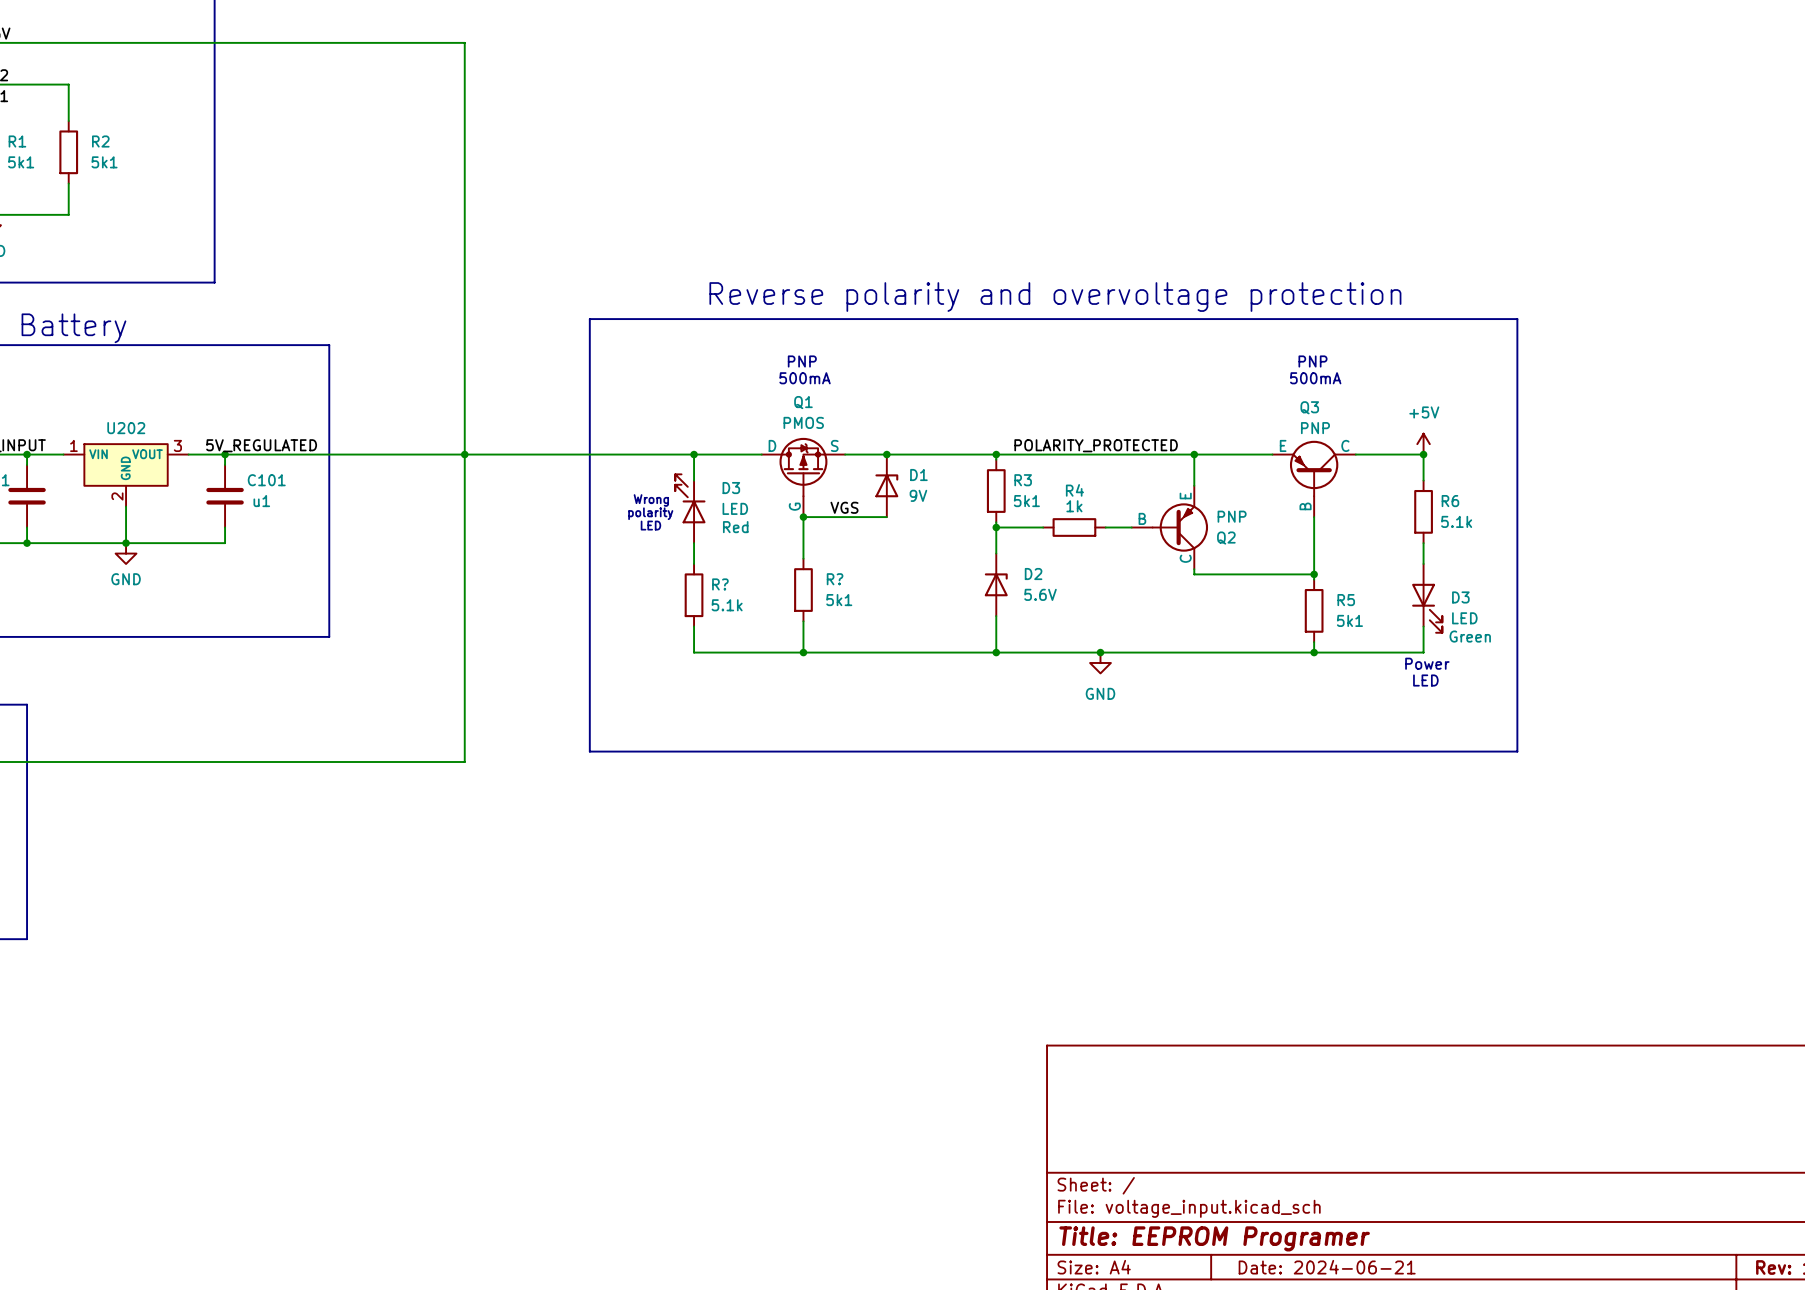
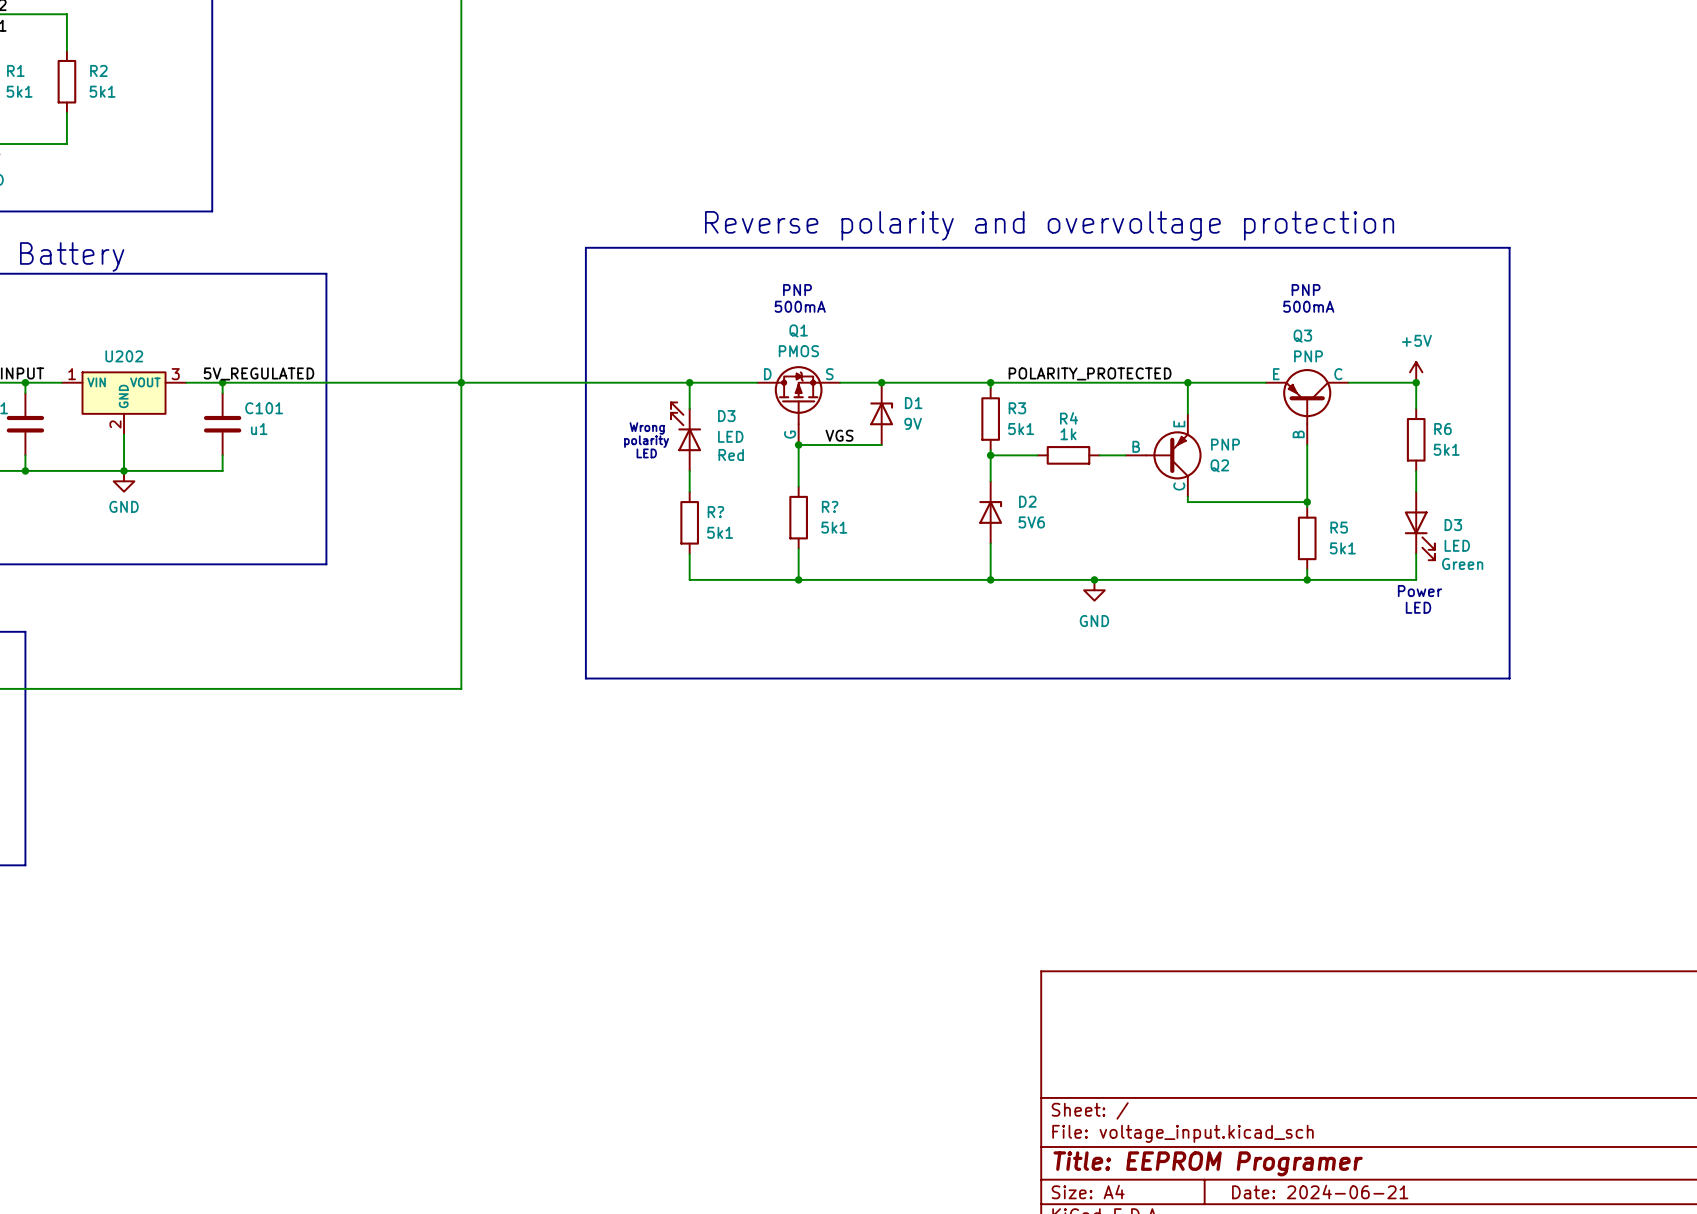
R6 value: 5.1k (1456, 521) -> 5k1 (1446, 449)
D2 value: 5.6V (1040, 594) -> 5V6 (1031, 522)
R? value: 5.1k (727, 605) -> 5k1 (720, 532)

